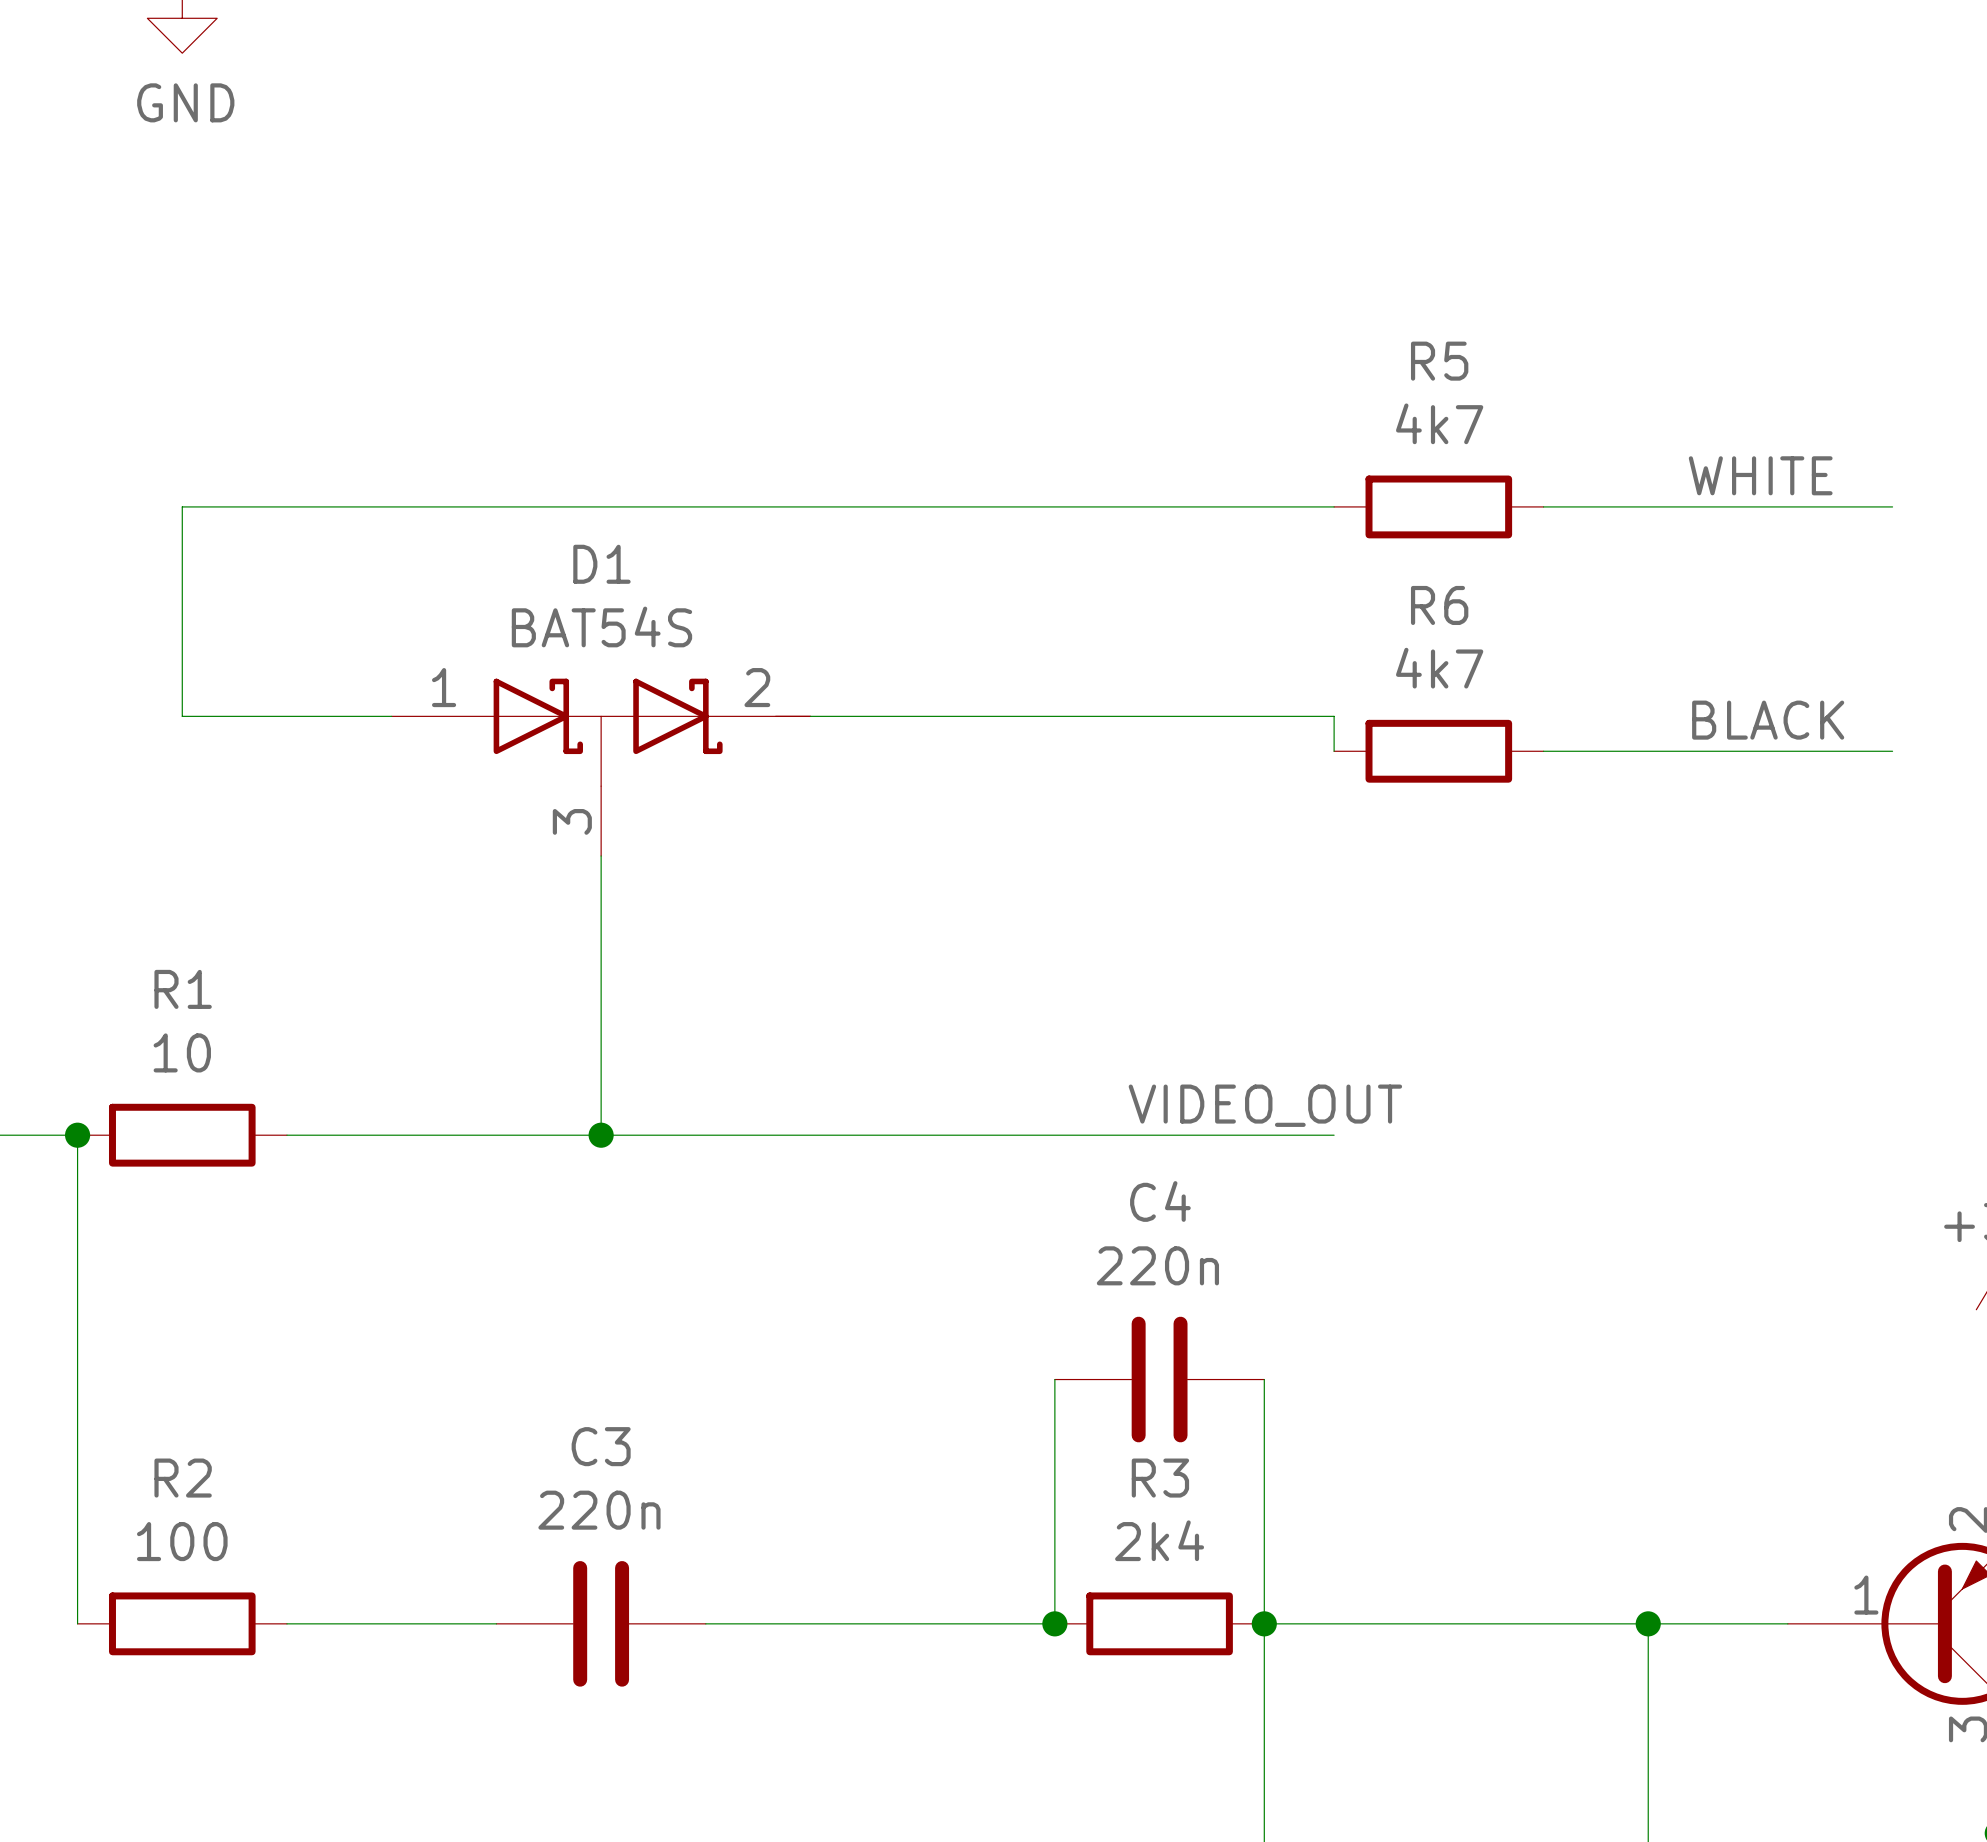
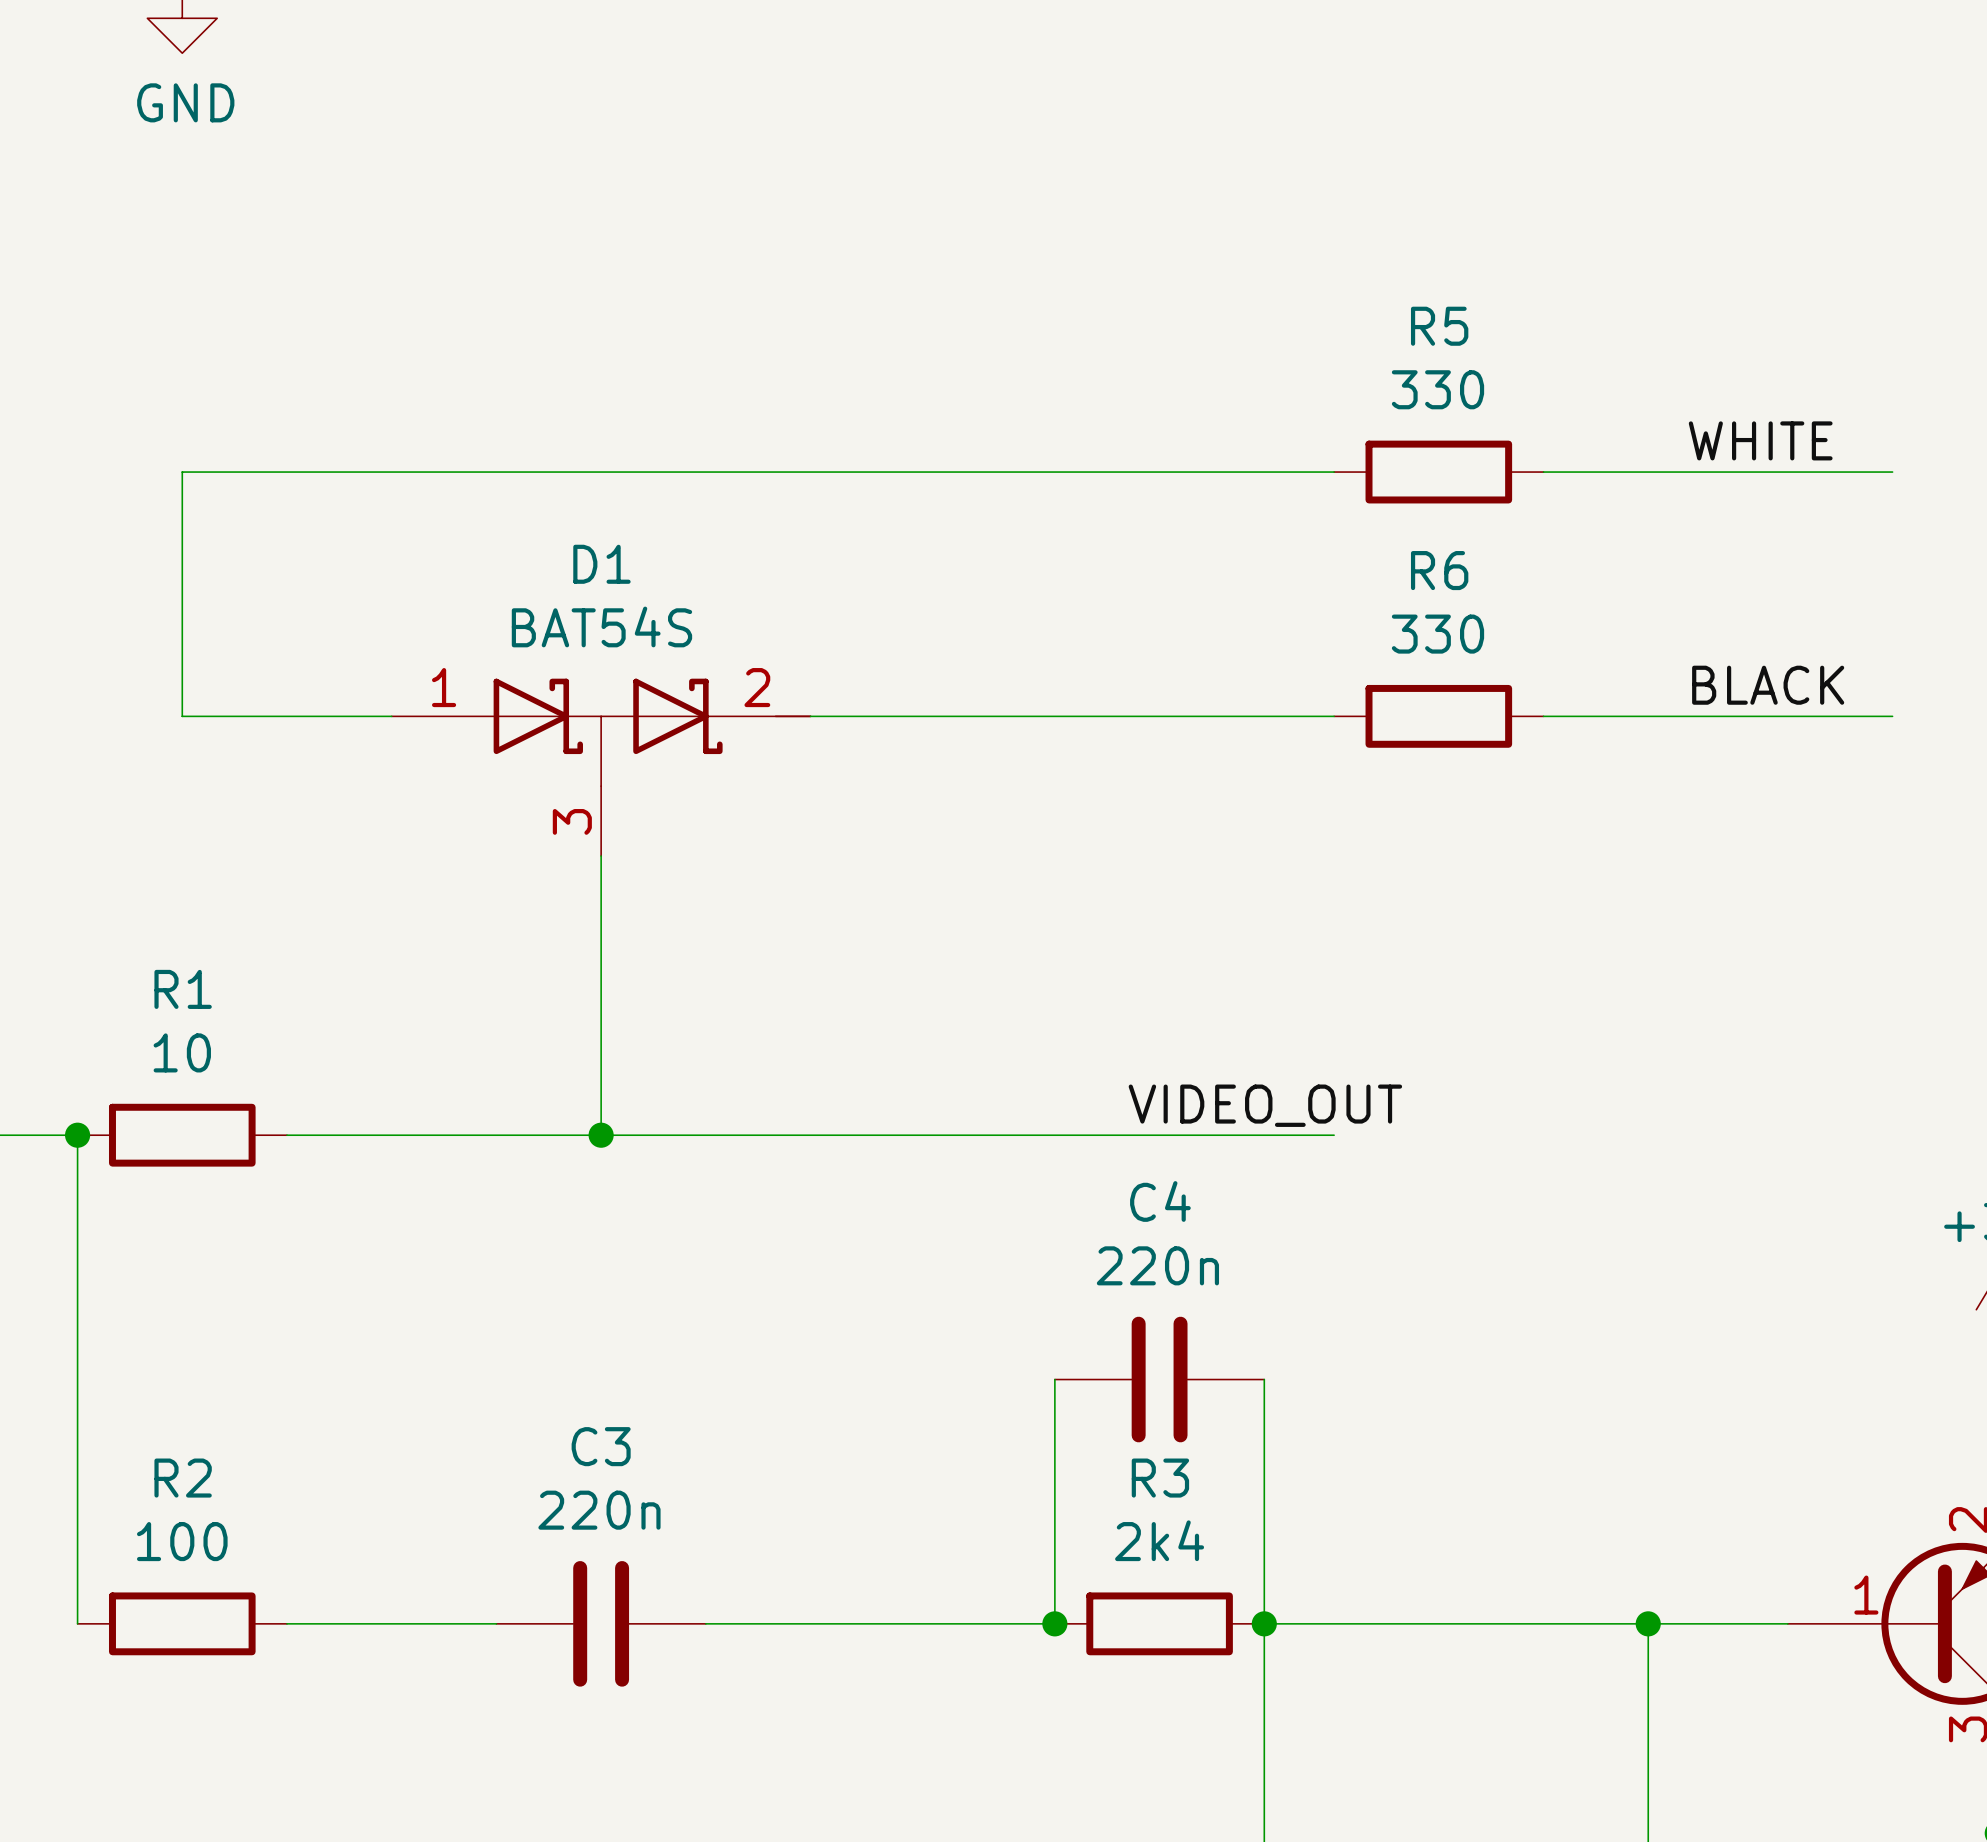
R5 value: 4k7 (1439, 423) -> 330 (1437, 389)
label position: WHITE (1760, 475) -> WHITE (1760, 440)
wire: (182, 506) (1334, 506) -> (182, 506) (182, 472) (1334, 472)
R5 position: (1438, 506) -> (1438, 472)
wire: (1543, 506) (1892, 506) -> (1543, 472) (1892, 472)
R6 value: 4k7 (1439, 668) -> 330 (1437, 634)
wire: (1334, 716) (1334, 751) -> none
label position: BLACK (1768, 720) -> BLACK (1768, 685)
R6 position: (1438, 751) -> (1438, 716)
wire: (1543, 751) (1892, 751) -> (1543, 716) (1892, 716)

